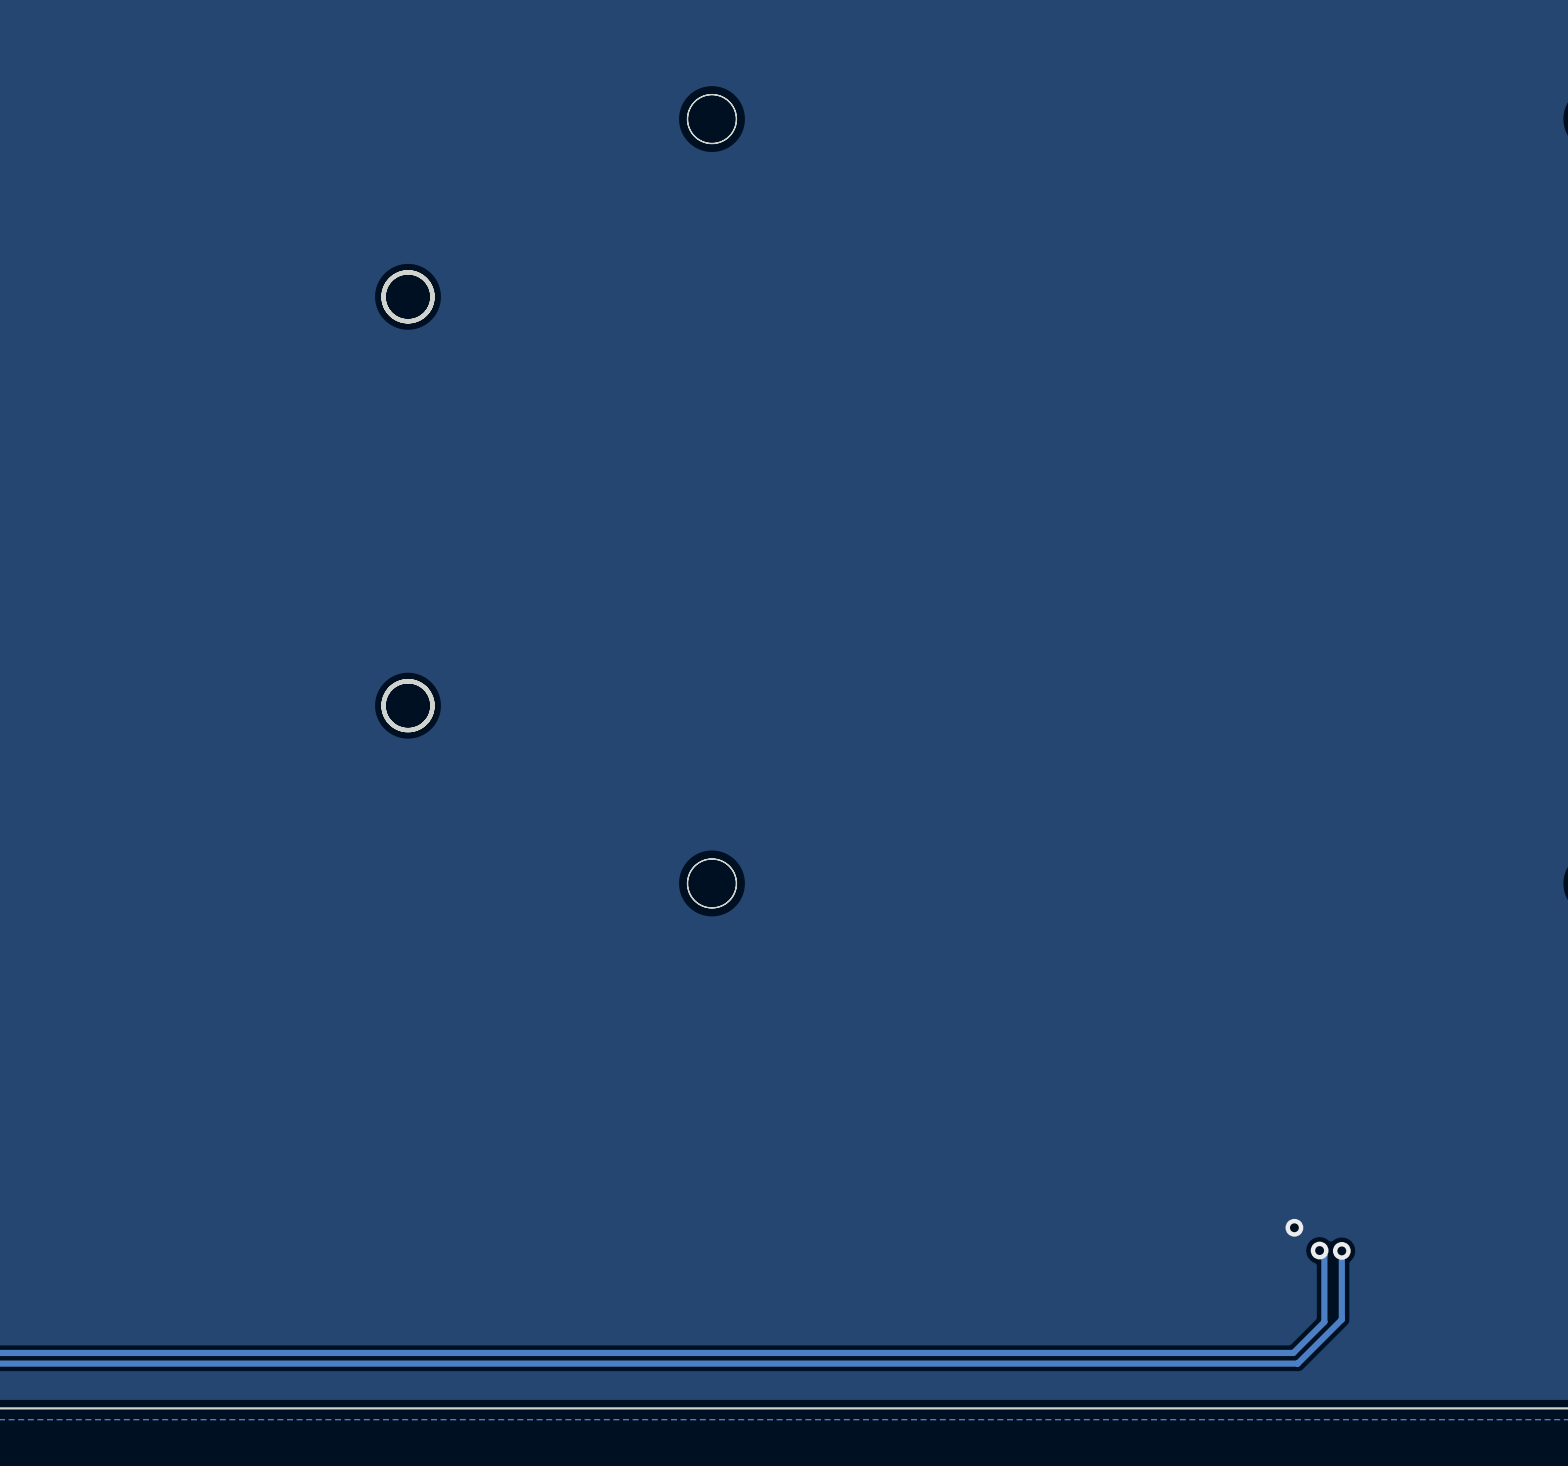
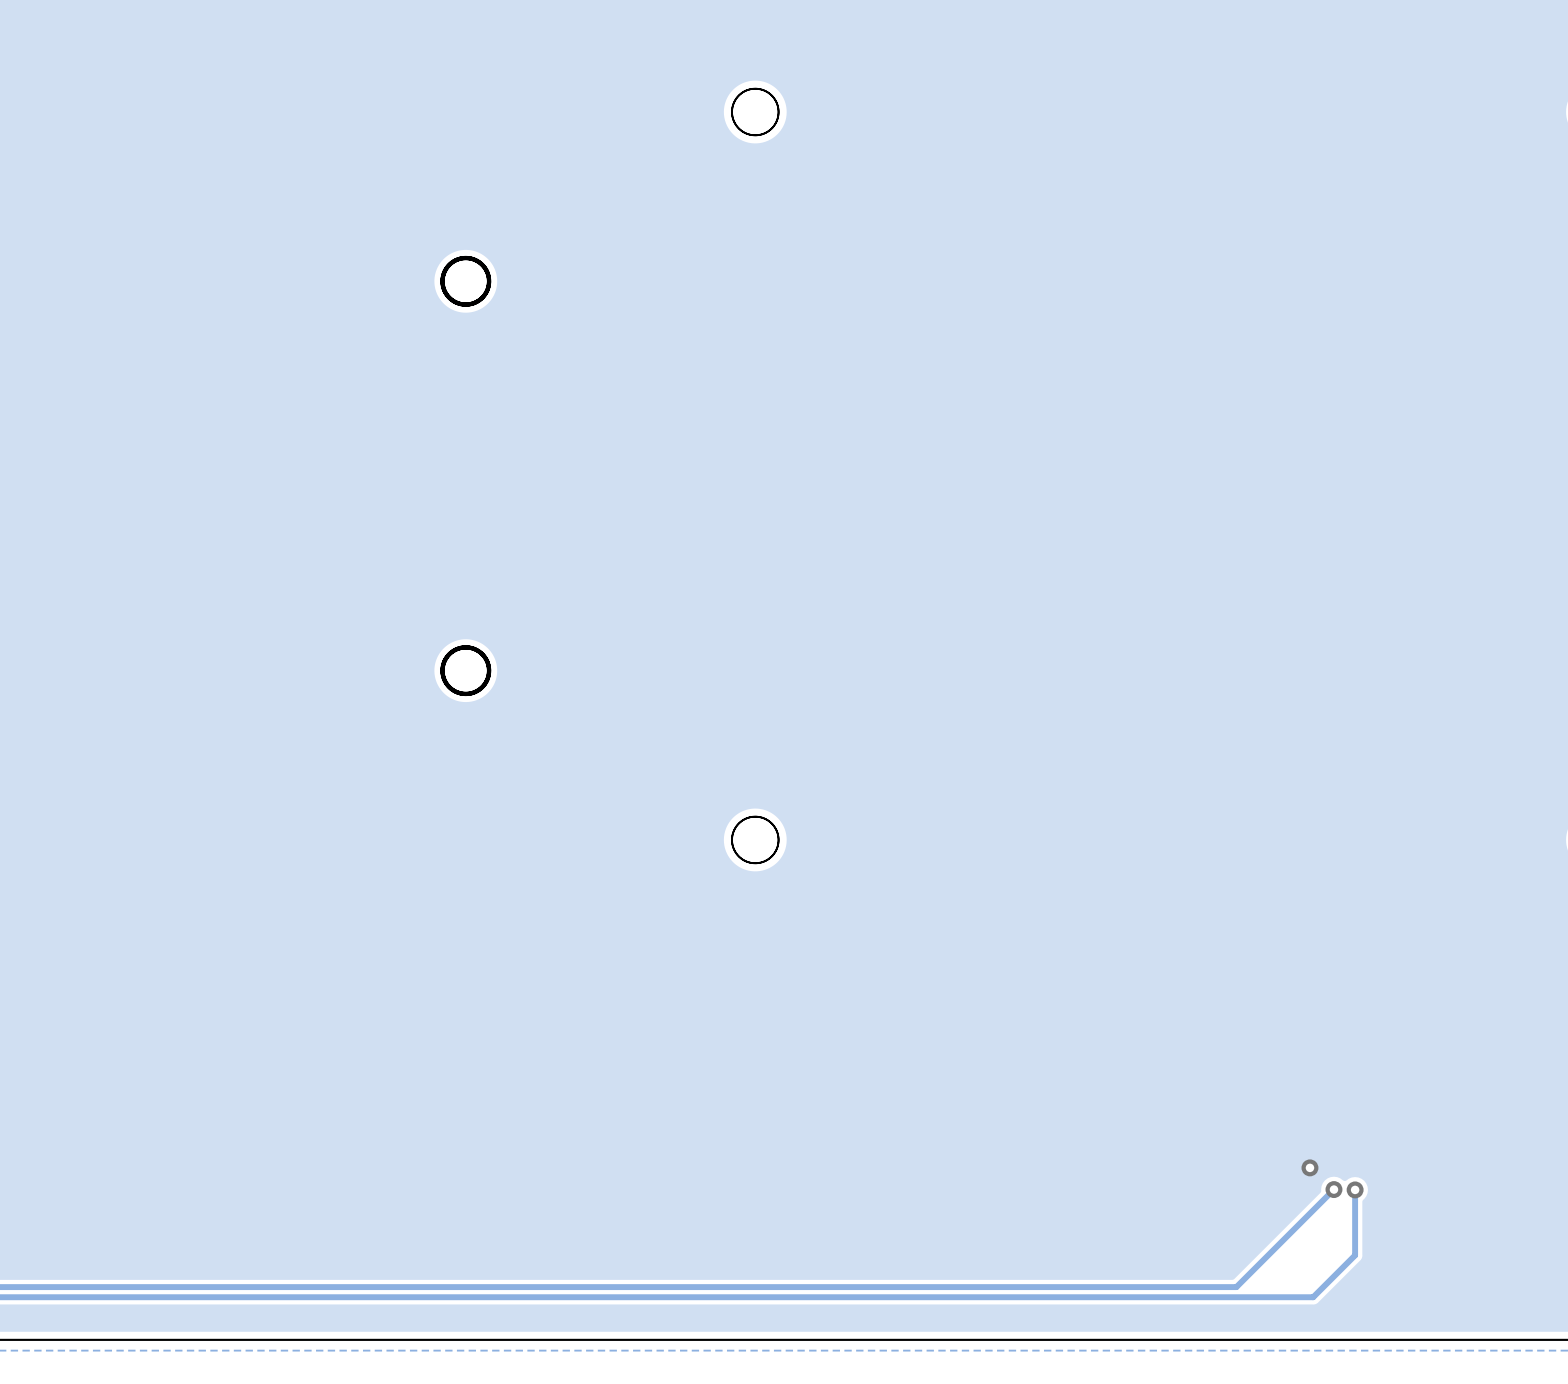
track: (1319, 1250) (1324, 1255) (1324, 1321) (1293, 1352) (1217, 1352) -> (1333, 1189) (1236, 1287)

